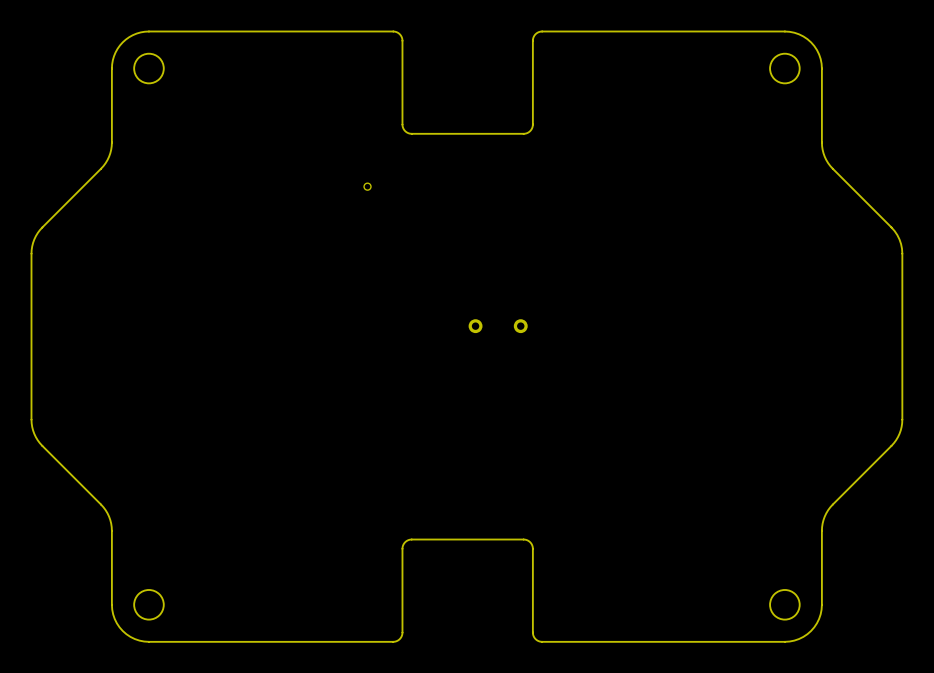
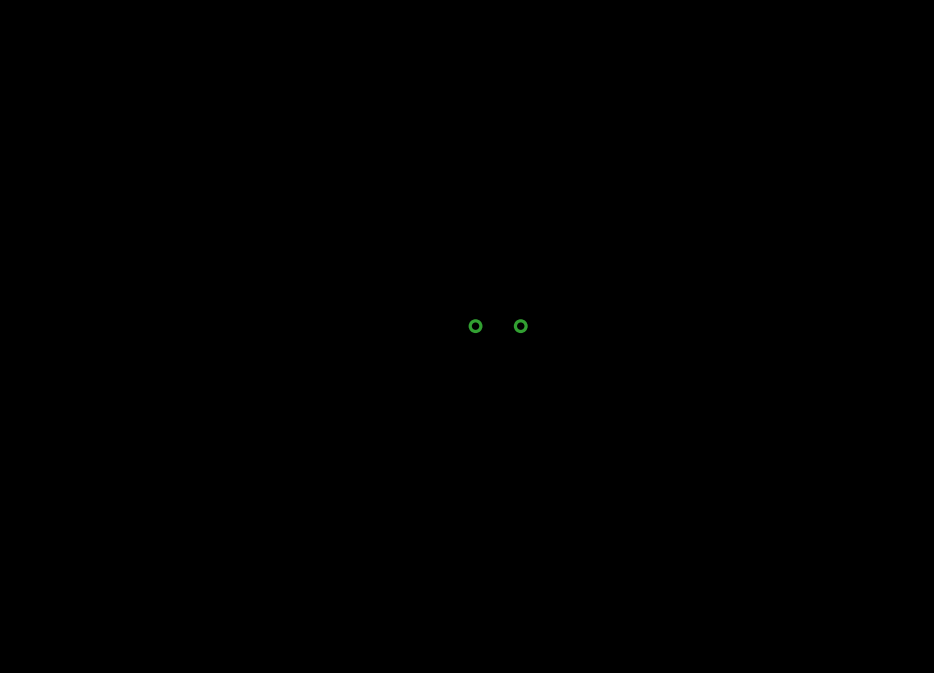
board edge: (784, 31) (539, 32) (532, 39) (532, 125) (529, 131) (523, 133) (411, 133) (405, 131) (402, 124) (402, 39) (400, 35) (395, 31) (148, 31) (136, 33) (122, 42) (115, 52) (112, 64) (111, 142) (109, 156) (101, 168) (39, 230) (33, 242) (31, 253) (32, 426) (39, 443) (101, 504) (109, 516) (111, 530) (112, 609) (114, 618) (122, 630) (134, 639) (148, 641) (395, 641) (400, 638) (402, 633) (402, 547) (405, 542) (411, 539) (523, 539) (529, 541) (532, 548) (532, 633) (535, 639) (539, 641) (784, 641) (799, 639) (811, 630) (816, 623) (821, 609) (821, 530) (824, 516) (832, 504) (893, 443) (901, 426) (902, 253) (901, 244) (894, 231) (826, 160) (822, 146) (820, 58) (816, 50) (807, 39) (799, 34) (784, 31) -> none
round board edge: [133, 52, 165, 85] -> none
round board edge: [769, 52, 801, 85] -> none
part: (367, 186) -> none
round board edge: [133, 589, 165, 621] -> none
round board edge: [769, 589, 801, 621] -> none

